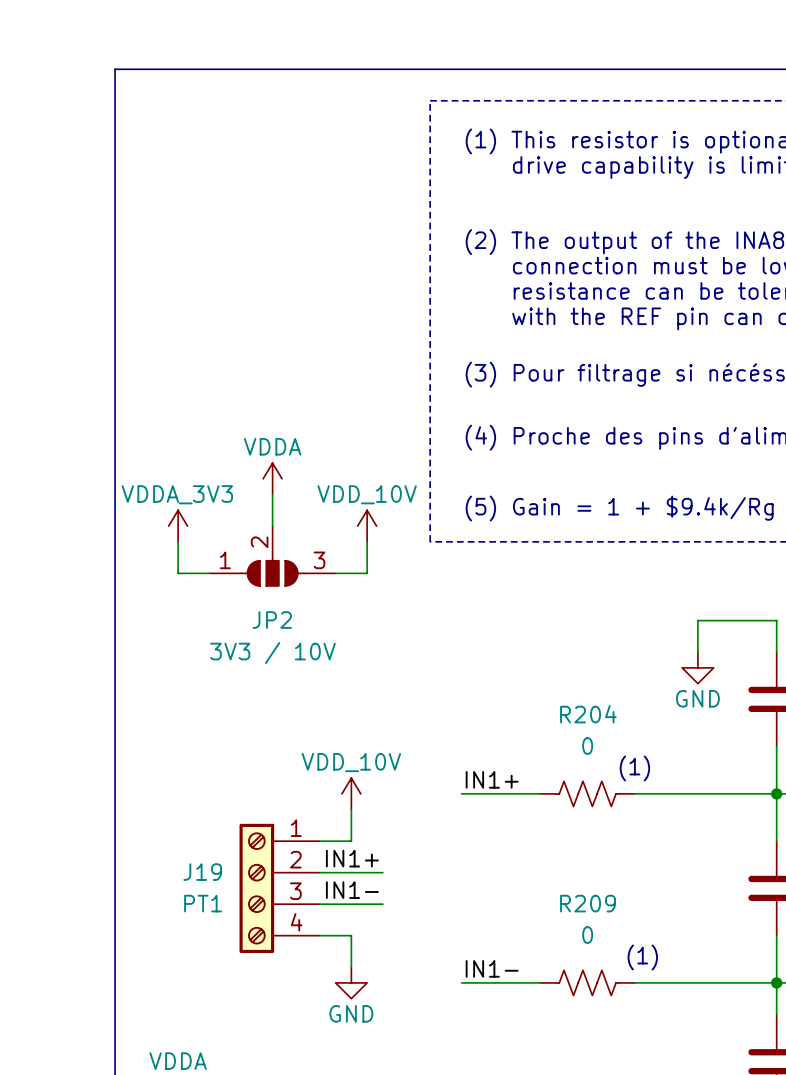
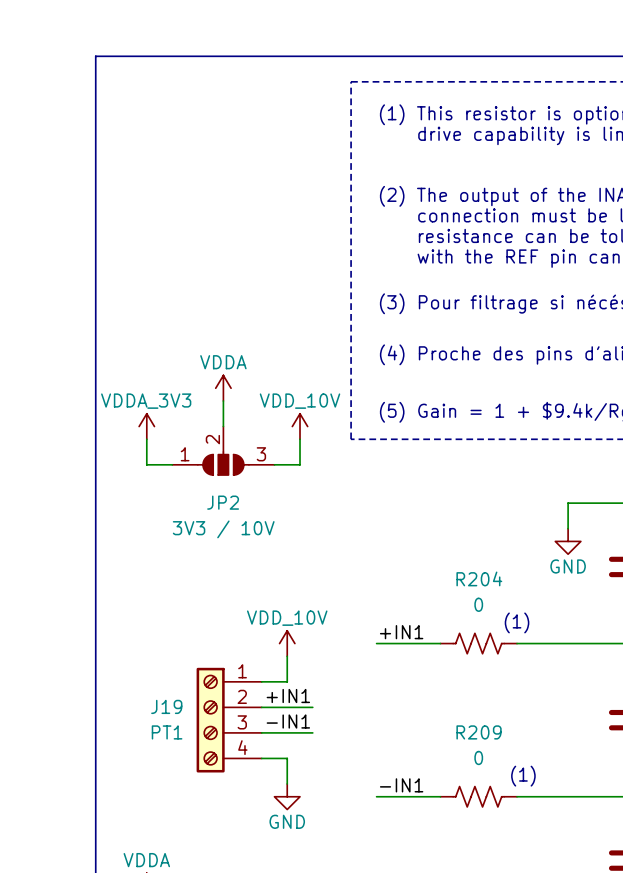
label: IN1+ (492, 779) -> +IN1 (401, 632)
label: IN1+ (352, 858) -> +IN1 (288, 695)
label: IN1- (352, 890) -> -IN1 (288, 721)
label: IN1- (492, 968) -> -IN1 (401, 785)

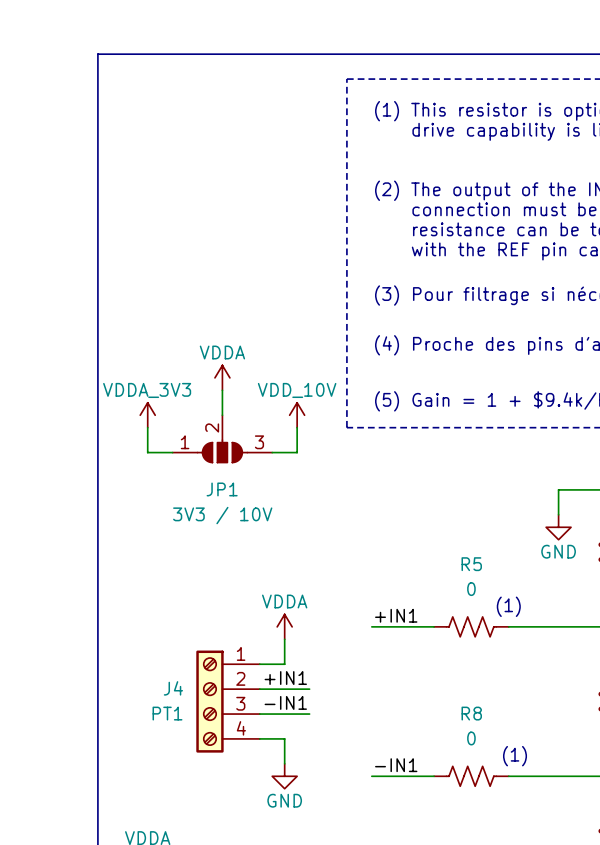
JP2 name: JP2 (223, 502) -> JP1 (222, 489)
R204 name: R204 (479, 578) -> R5 (471, 564)
power symbol: VDD_10V (287, 643) -> VDDA (284, 626)
J19 name: J19 (166, 706) -> J4 (173, 688)
R209 name: R209 (479, 732) -> R8 (471, 713)

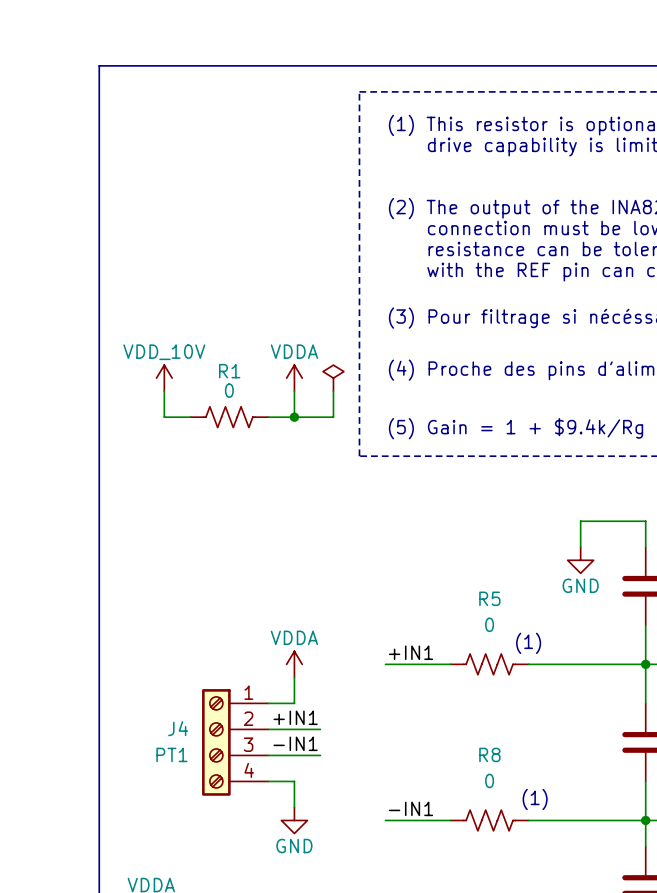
power symbol: none -> (333, 378)
wire: none -> (333, 391) (333, 417) (268, 417)
power symbol position: VDDA (222, 377) -> VDDA (294, 378)
wire: (222, 390) (222, 415) -> (294, 391) (294, 417)
R1: none -> 0 (229, 417)
junction: none -> (294, 417)
power symbol: VDDA_3V3 (147, 415) -> none
power symbol position: VDD_10V (297, 415) -> VDD_10V (164, 378)
wire: (147, 427) (147, 452) (172, 452) -> (164, 391) (164, 417) (190, 417)
wire: (297, 427) (297, 452) (272, 452) -> none
JP1: 3V3 / 10V (222, 438) -> none

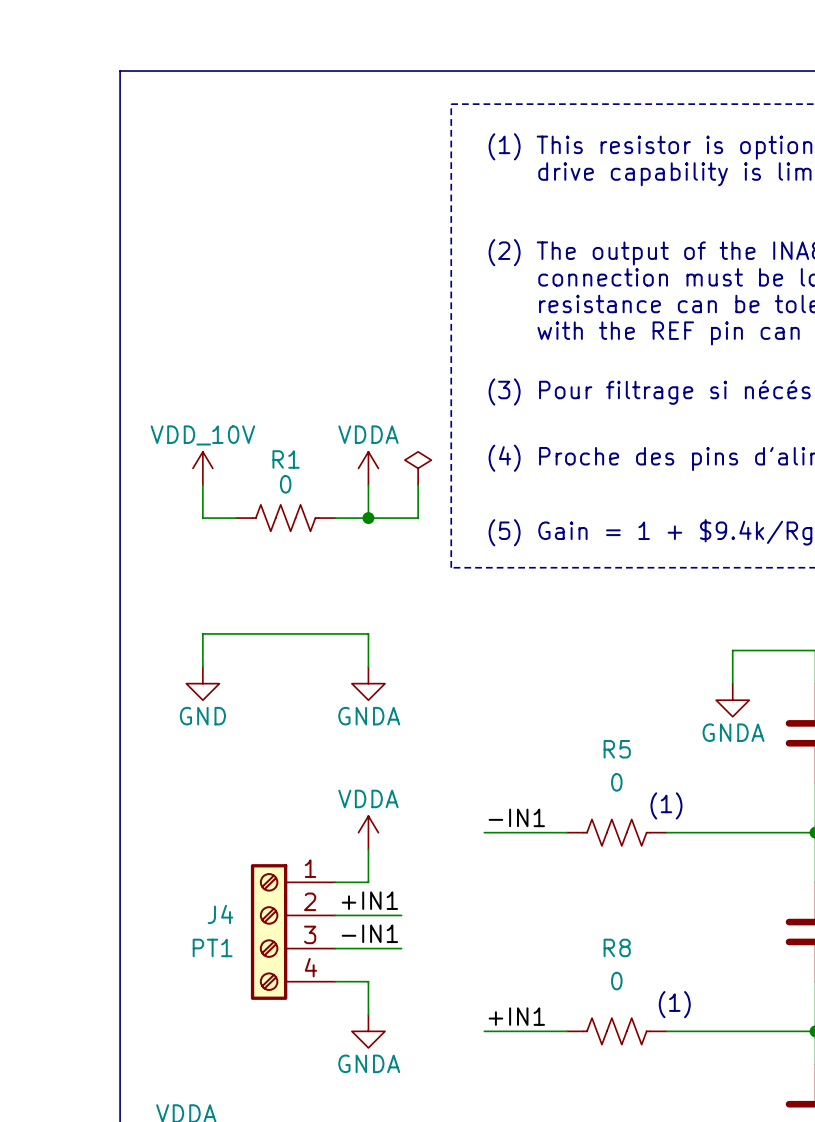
wire: none -> (202, 667) (202, 633) (368, 633) (368, 667)
power symbol: none -> GND (202, 683)
power symbol: none -> GNDA (368, 683)
power symbol: GND (580, 560) -> GNDA (732, 700)
label: +IN1 (411, 652) -> -IN1 (516, 817)
label: -IN1 (411, 808) -> +IN1 (516, 1016)
power symbol: GND (294, 820) -> GNDA (368, 1031)

